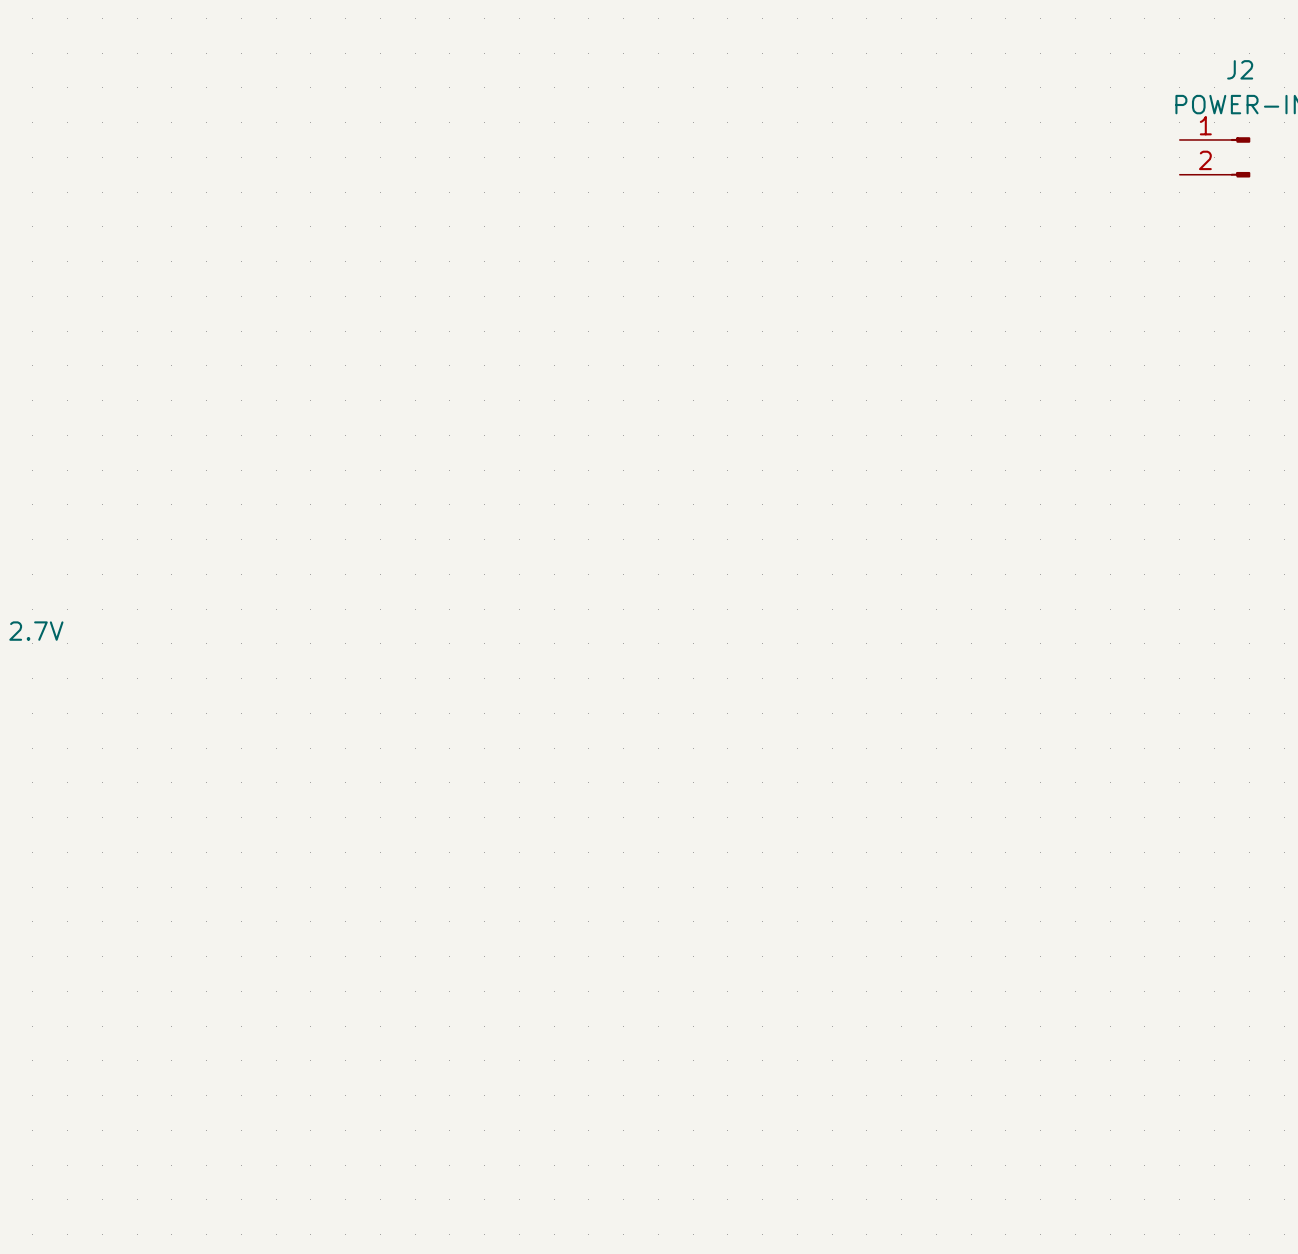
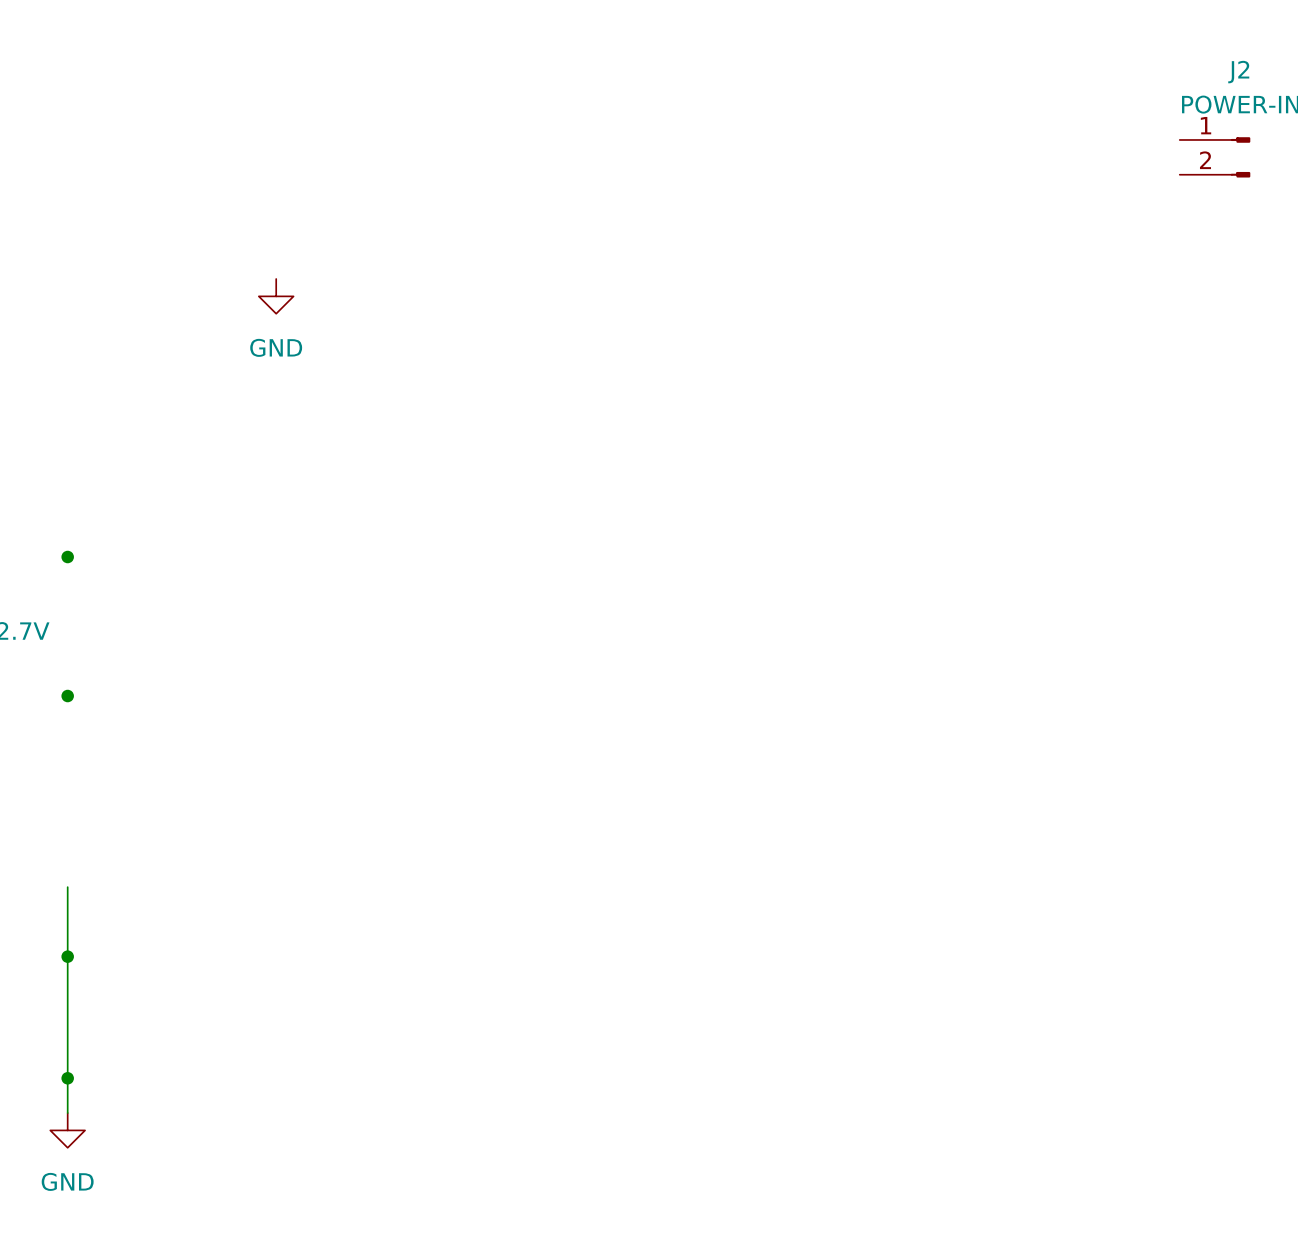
power symbol: none -> GND (276, 296)
junction: none -> (67, 557)
junction: none -> (67, 696)
wire: none -> (67, 887) (67, 1113)
junction: none -> (67, 956)
junction: none -> (67, 1078)
power symbol: none -> GND (67, 1130)

